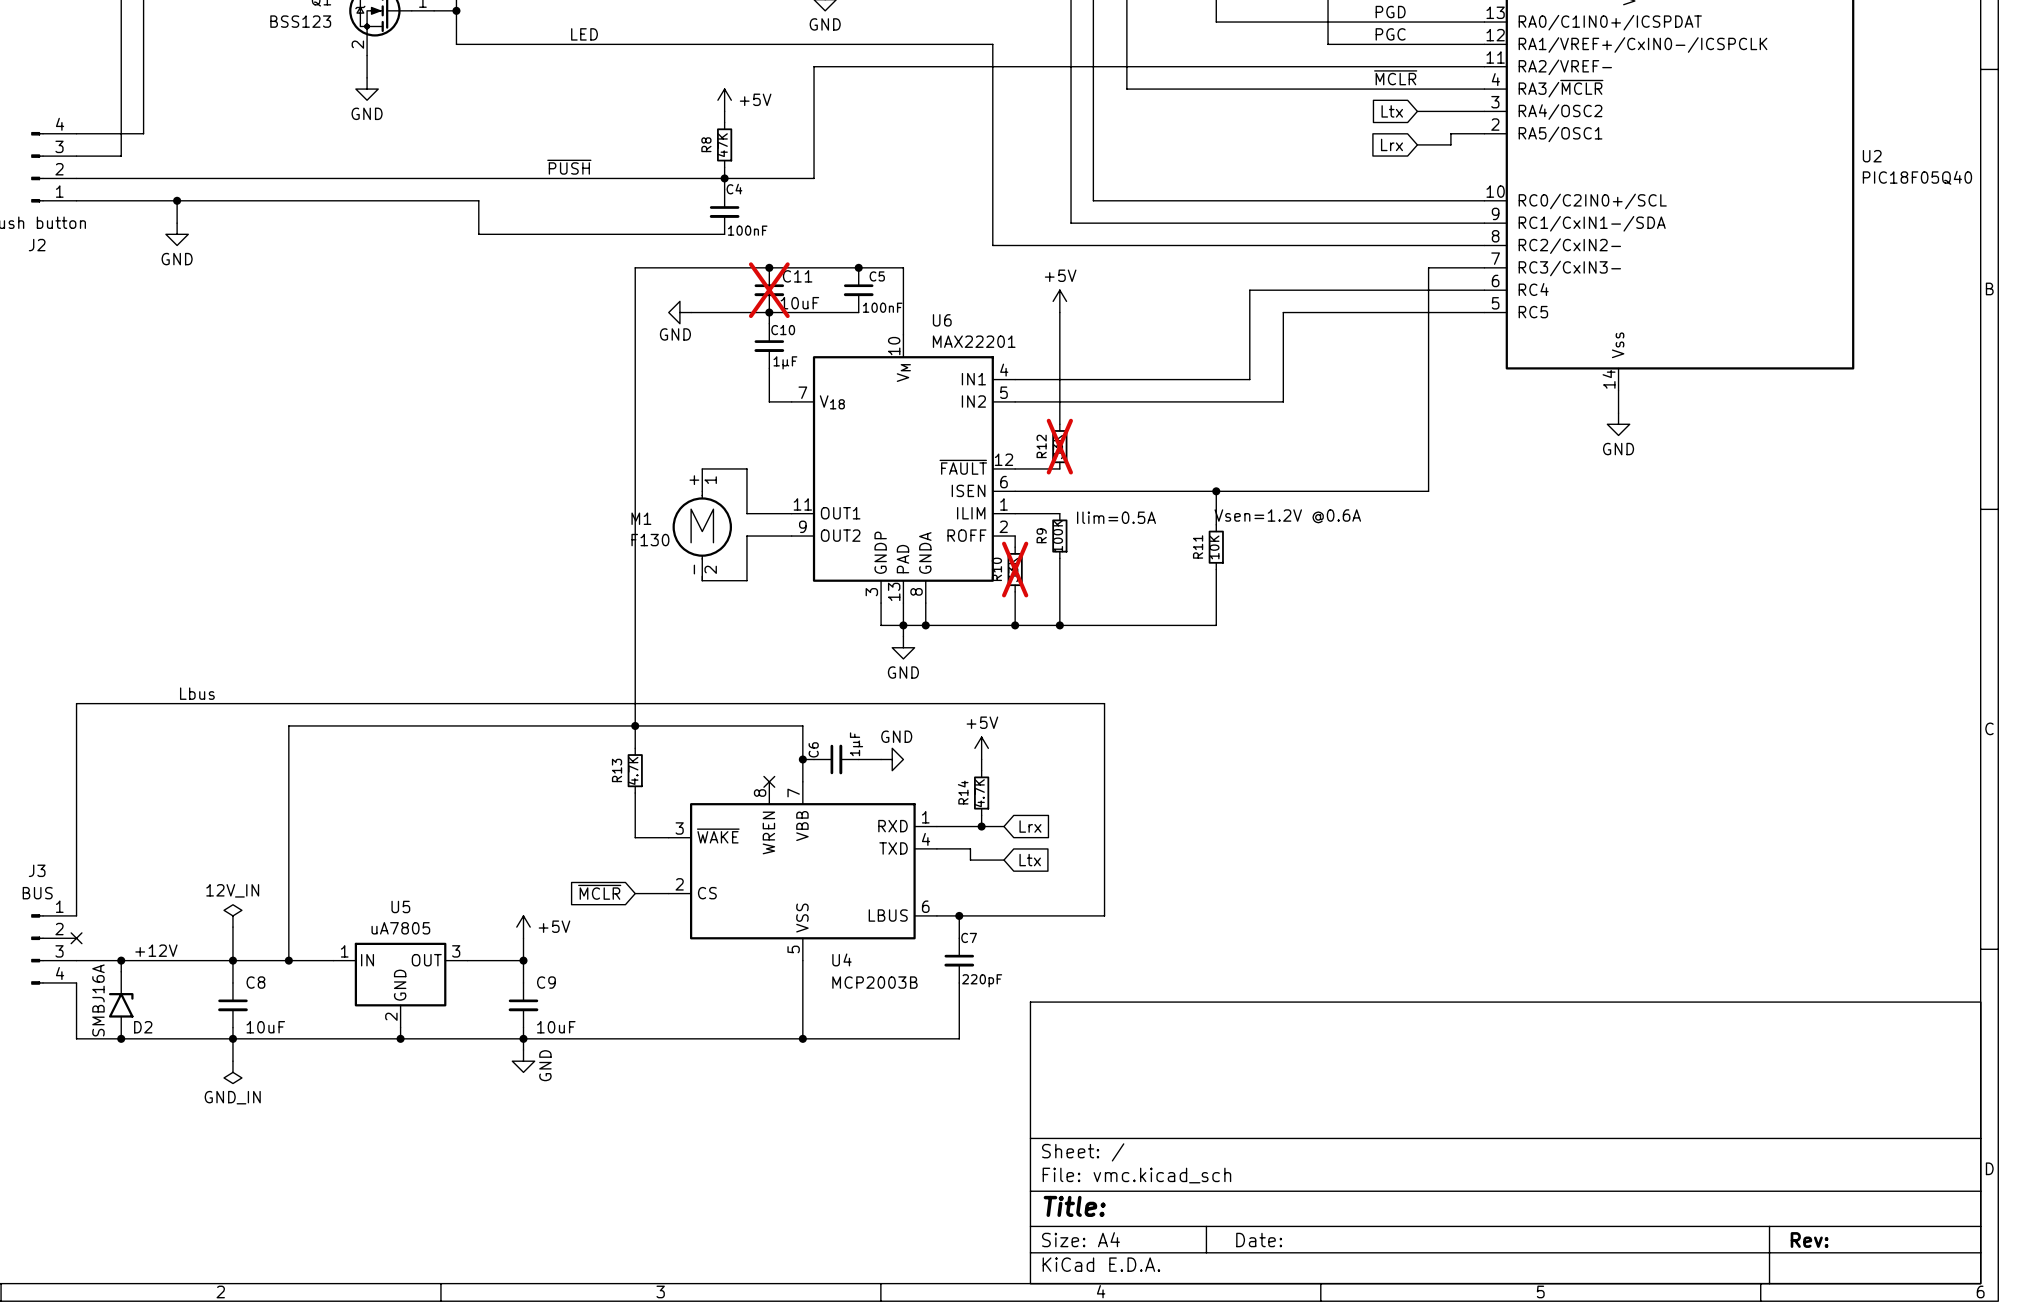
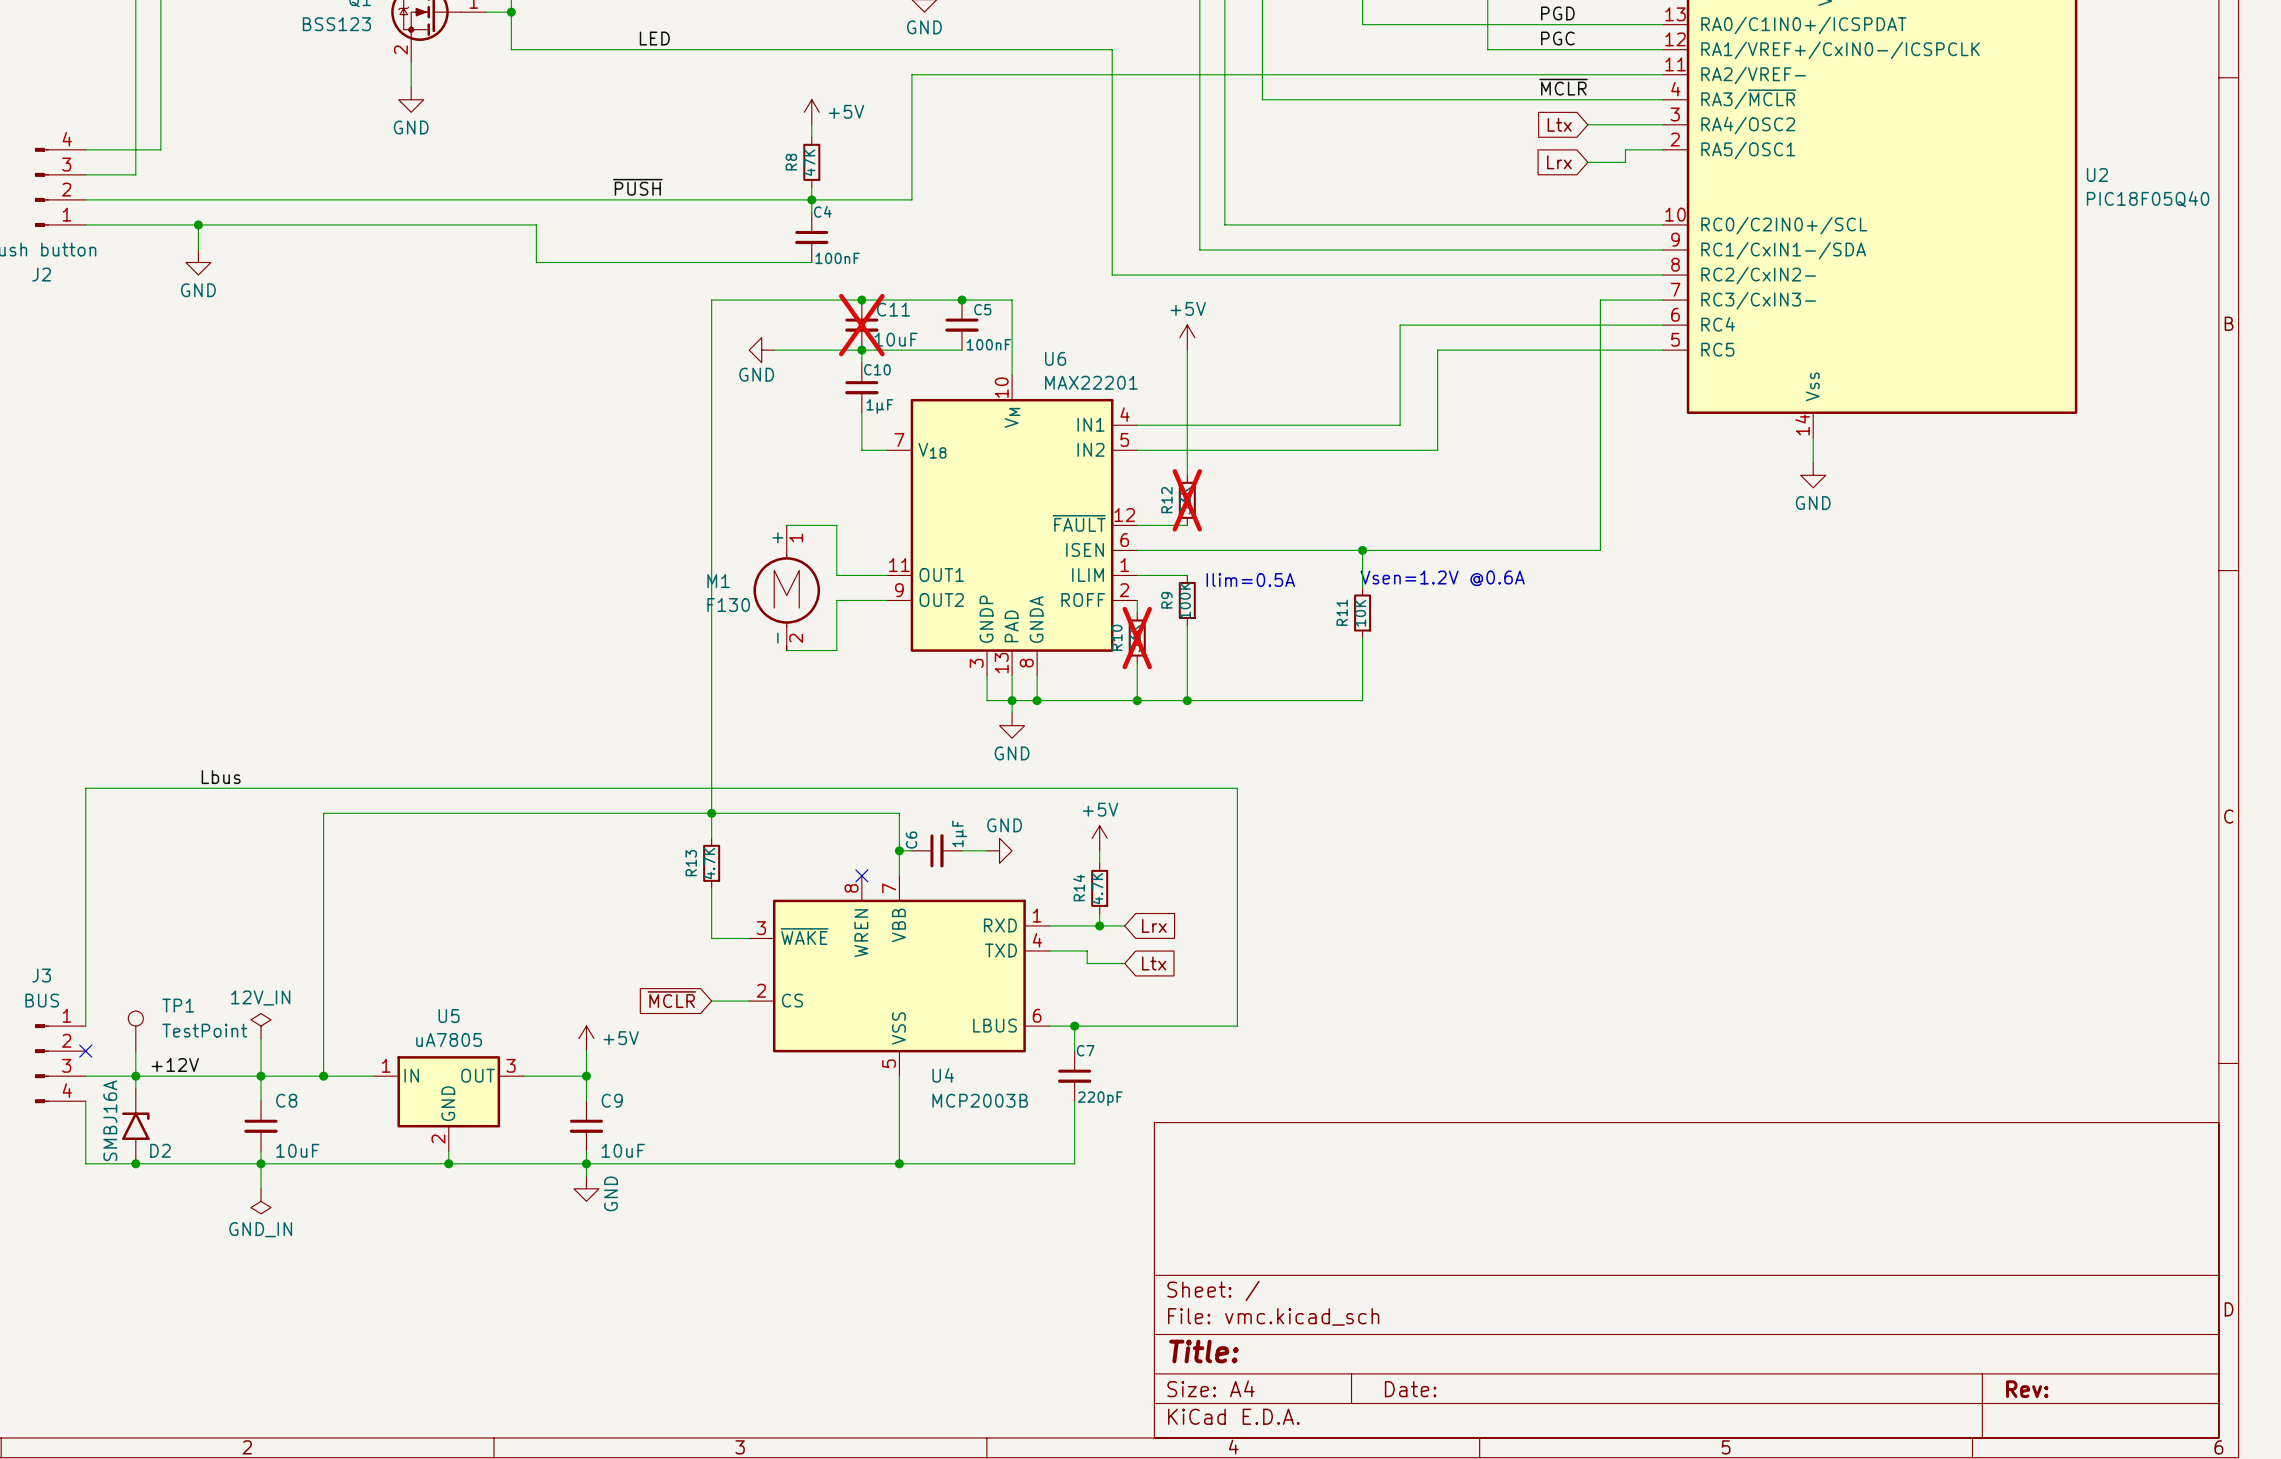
TP1: none -> TestPoint (135, 1031)
wire: none -> (135, 1051) (135, 1076)

